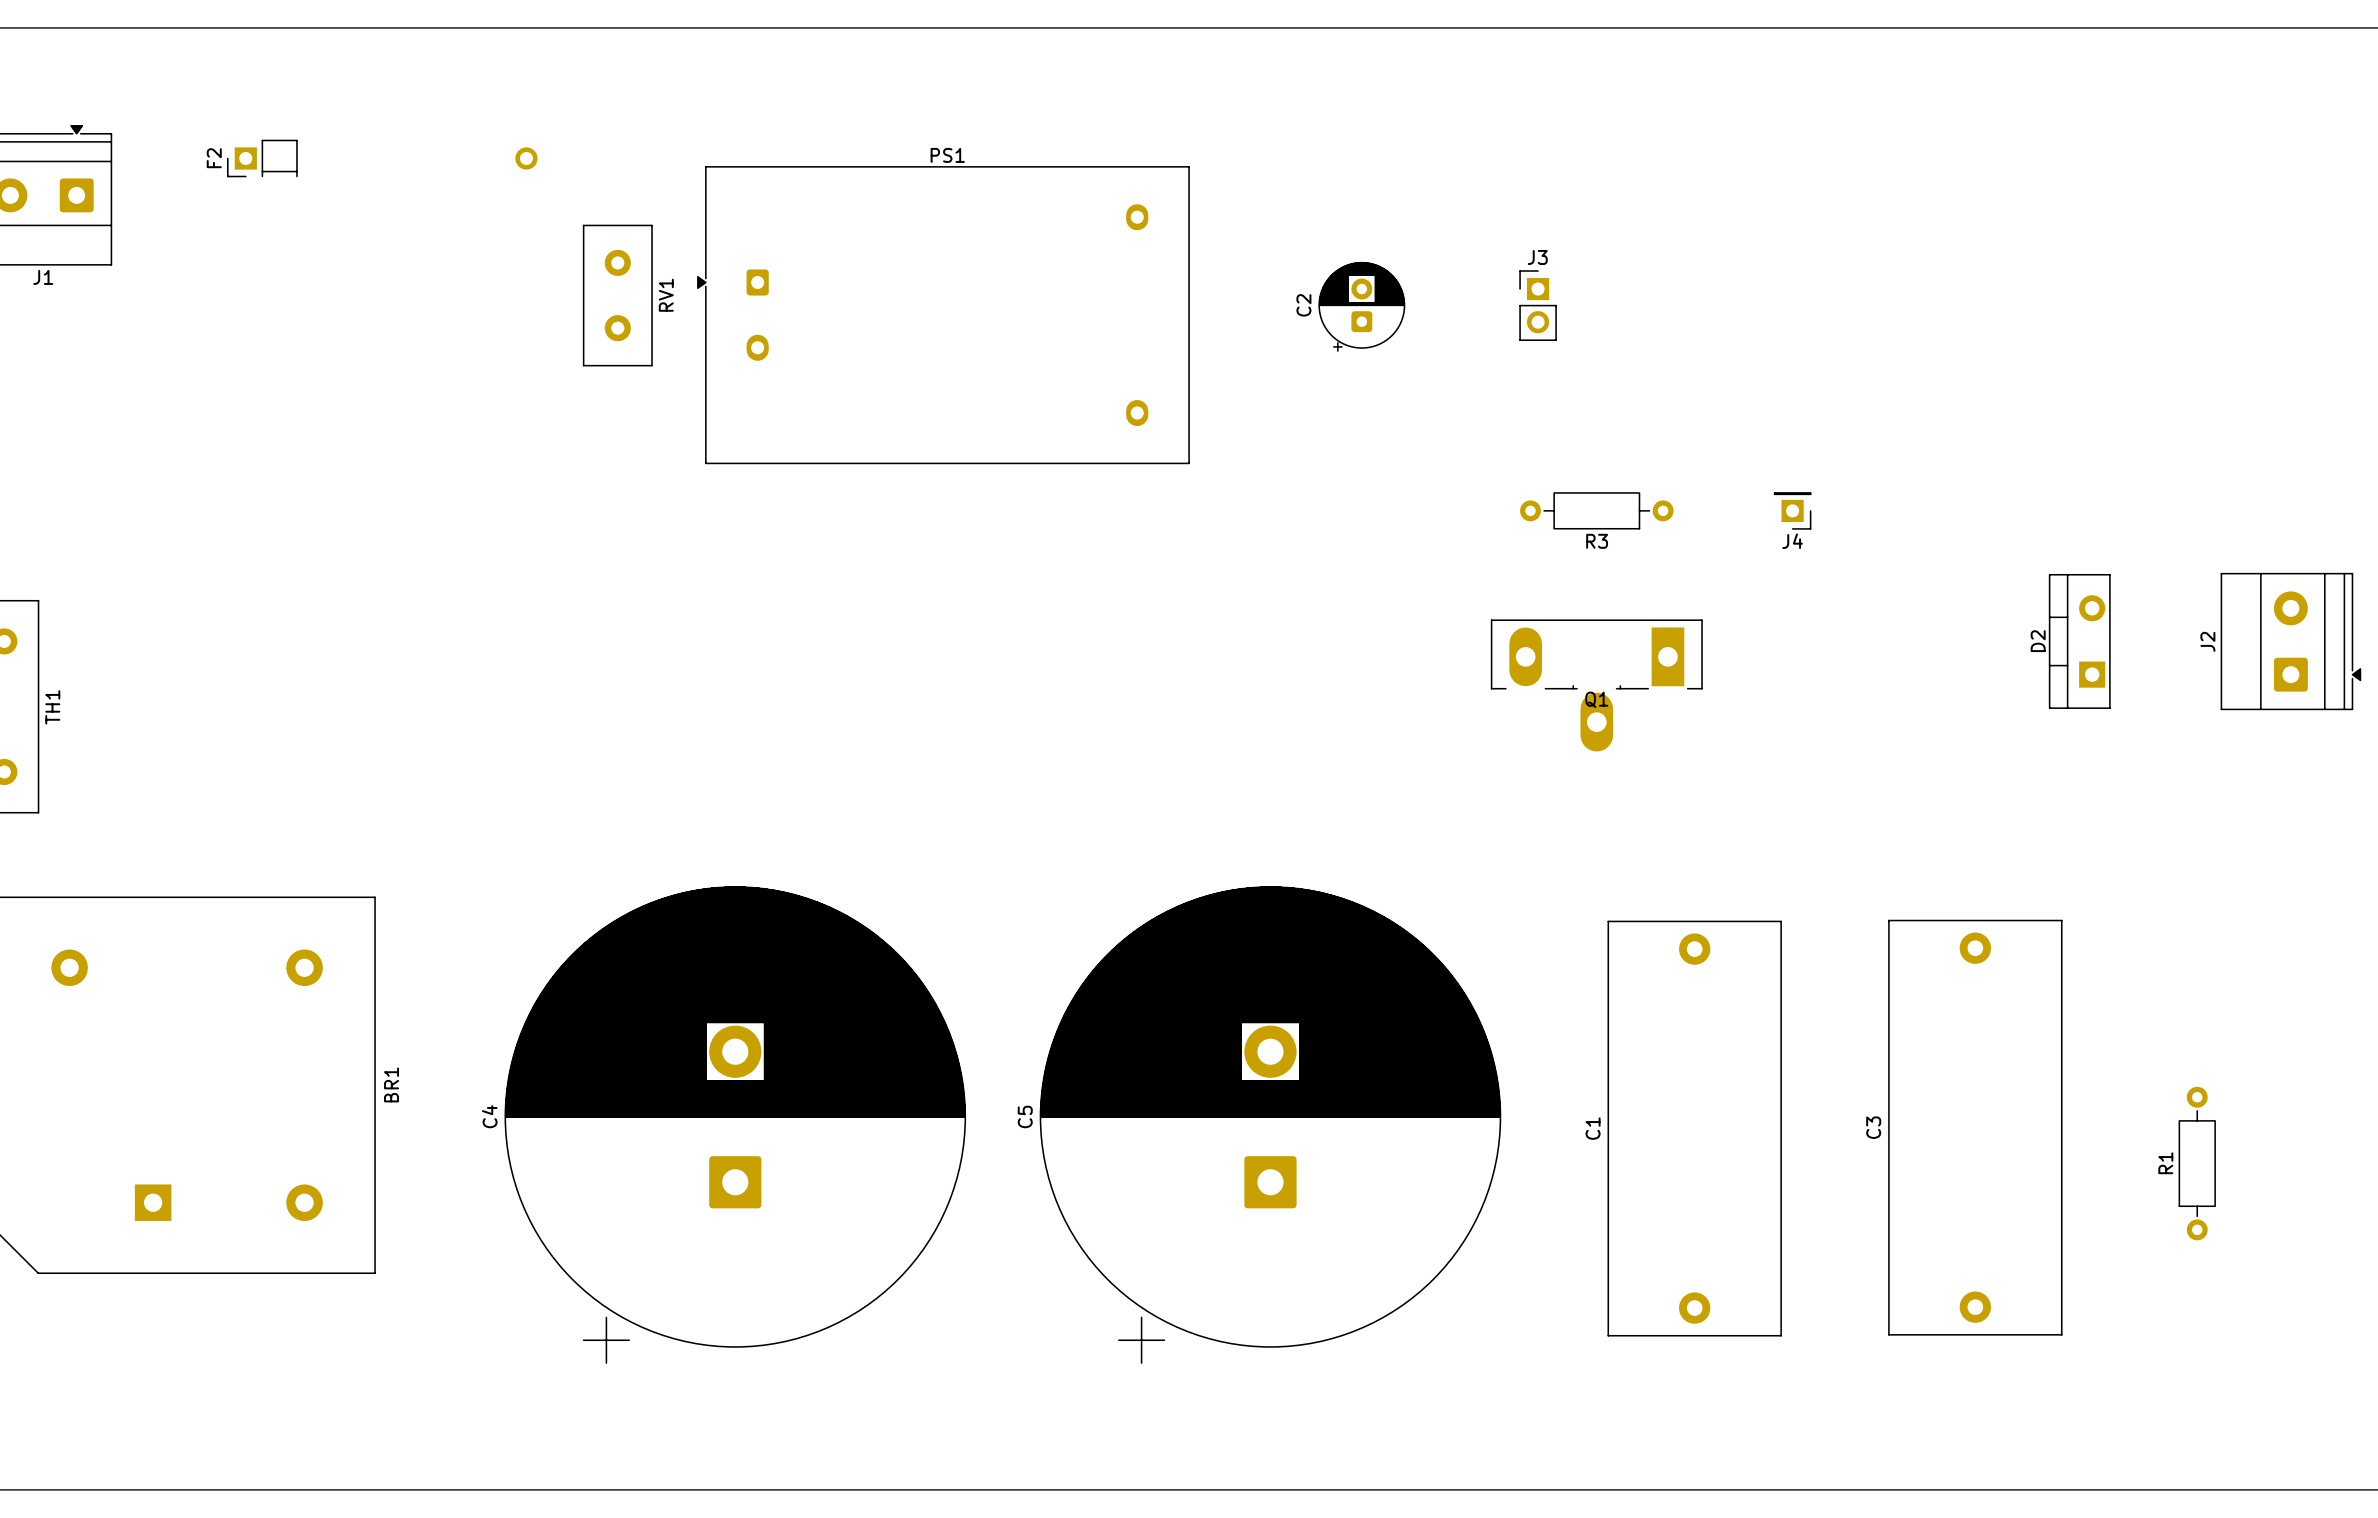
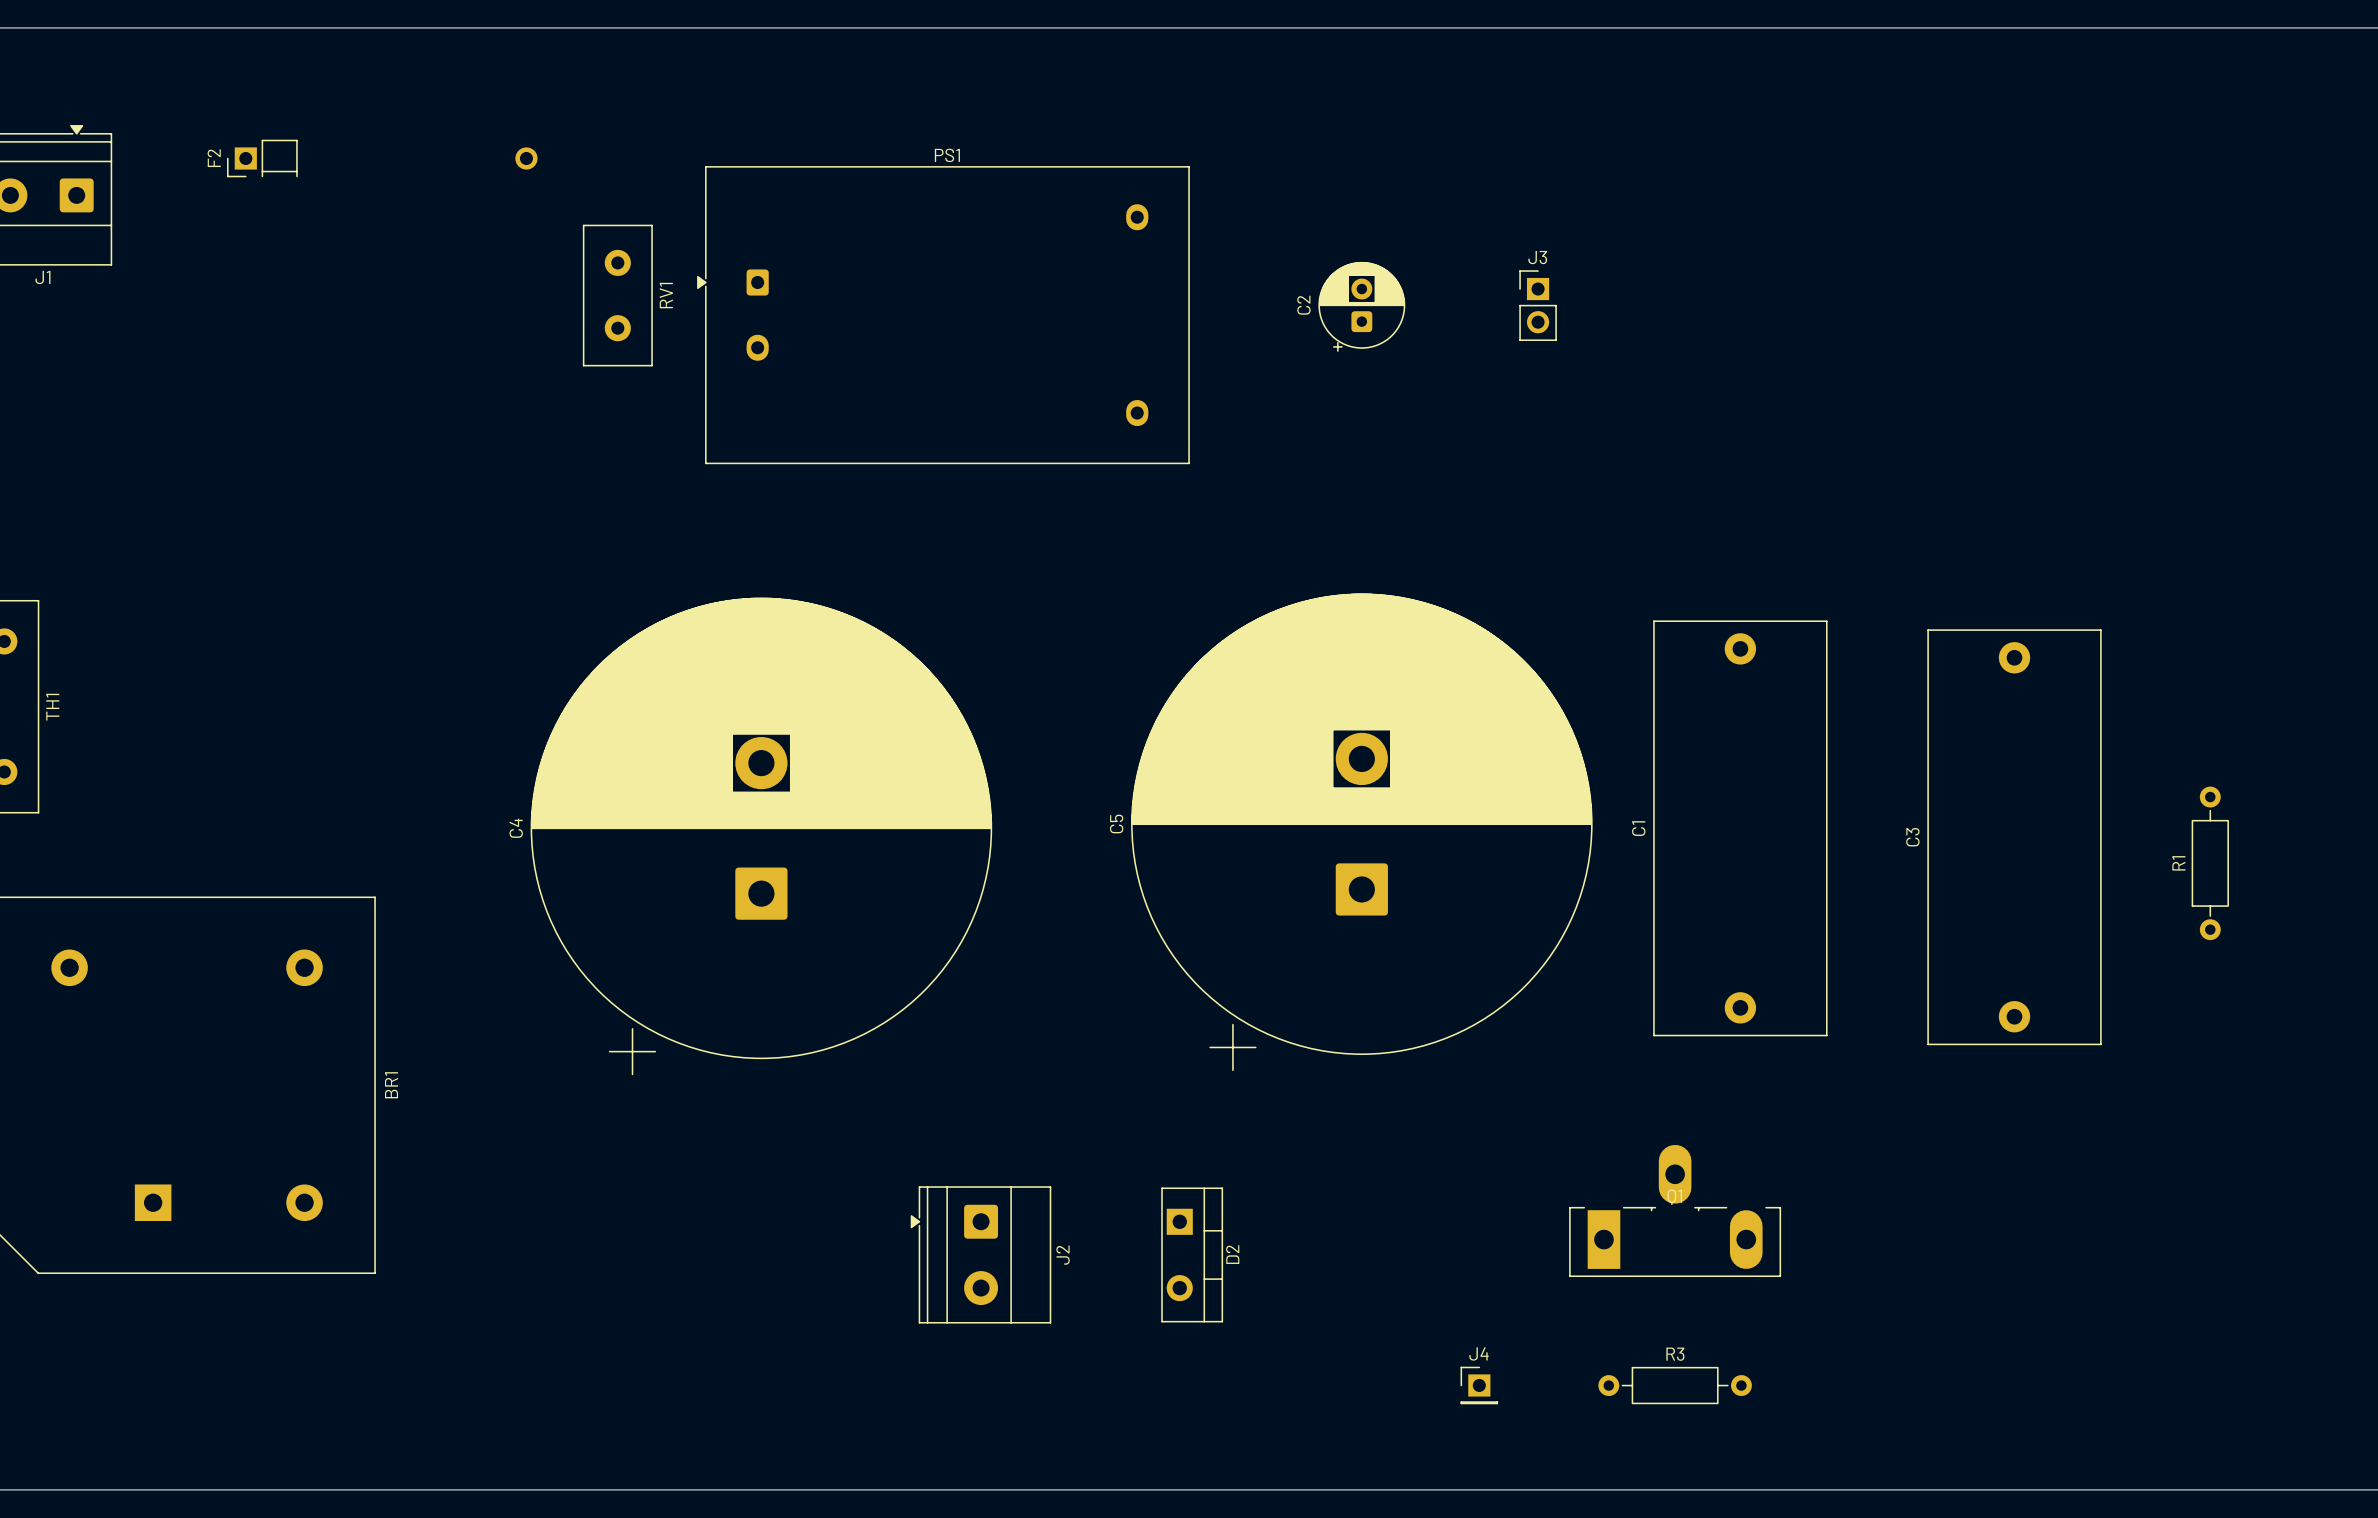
R3 position: (1596, 510) -> (1675, 1385)
J4 rotation: 0° (1792, 510) -> 180° (1479, 1385)
J4 position: (1792, 510) -> (1479, 1385)
R3 name position: R3 (1597, 541) -> R3 (1675, 1354)
D2 rotation: 0° (2079, 641) -> 180° (1192, 1254)
D2 position: (2079, 641) -> (1192, 1254)
J2 rotation: 0° (2290, 641) -> 180° (980, 1254)
J2 position: (2290, 641) -> (980, 1254)
Q1 rotation: 0° (1596, 685) -> 180° (1675, 1210)
Q1 position: (1596, 685) -> (1675, 1210)
C4 position: (735, 1125) -> (761, 836)
C5 position: (1270, 1125) -> (1361, 832)
C3 position: (1975, 1127) -> (2014, 837)
C1 position: (1694, 1128) -> (1740, 828)
R1 position: (2197, 1163) -> (2210, 863)

